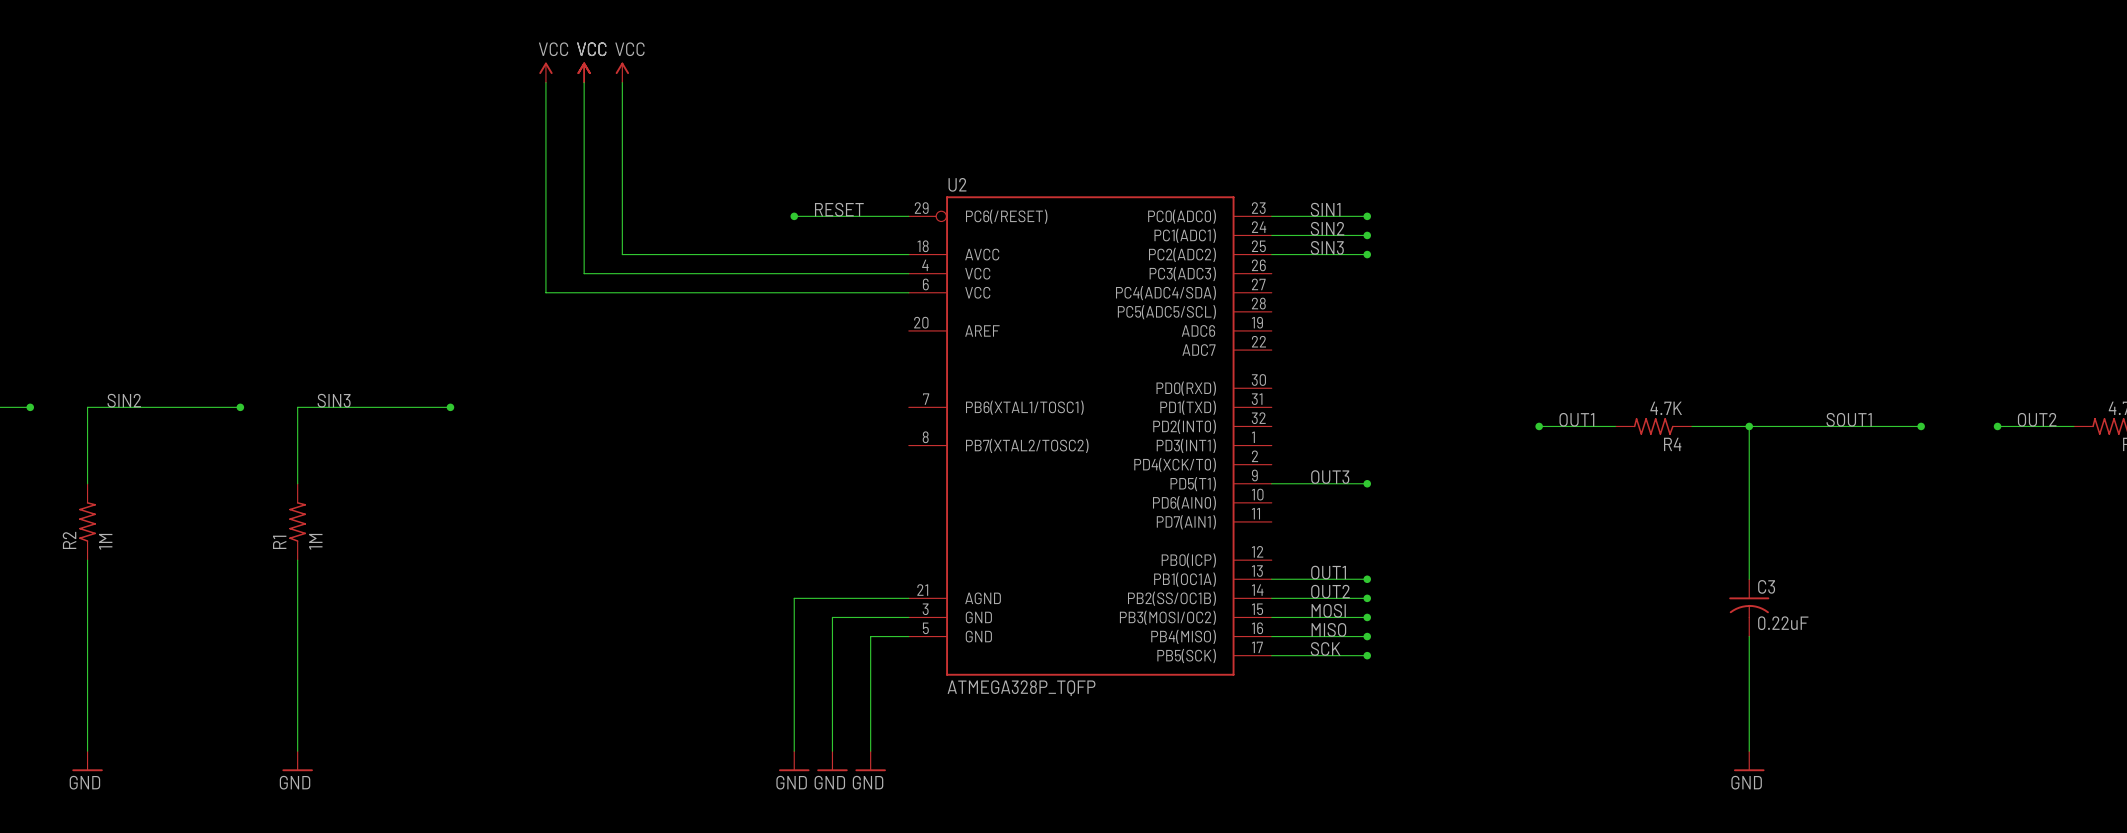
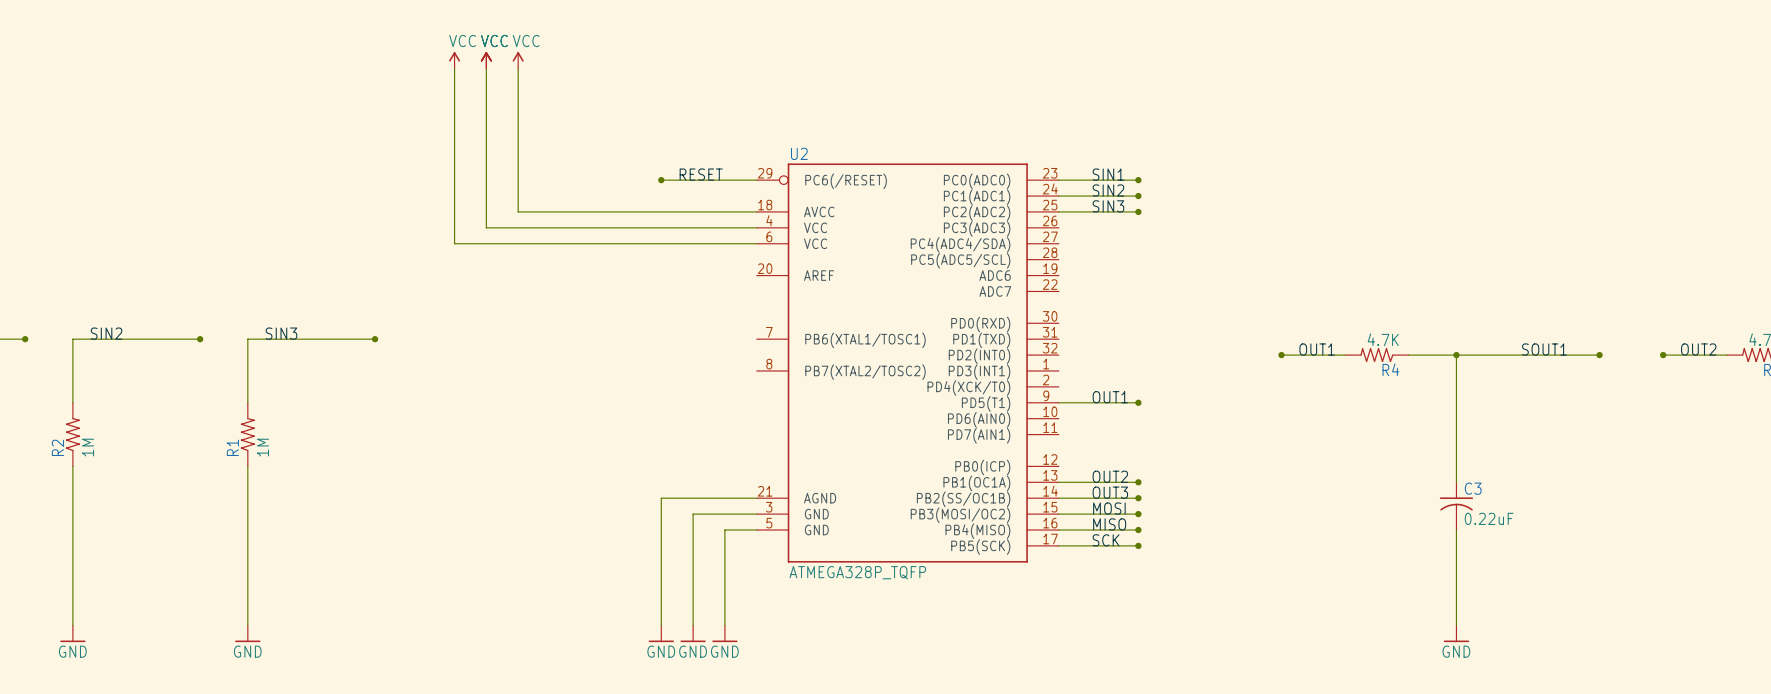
label: OUT3 (1330, 477) -> OUT1 (1110, 397)
label: OUT1 (1328, 572) -> OUT2 (1110, 476)
label: OUT2 (1330, 591) -> OUT3 (1110, 492)

